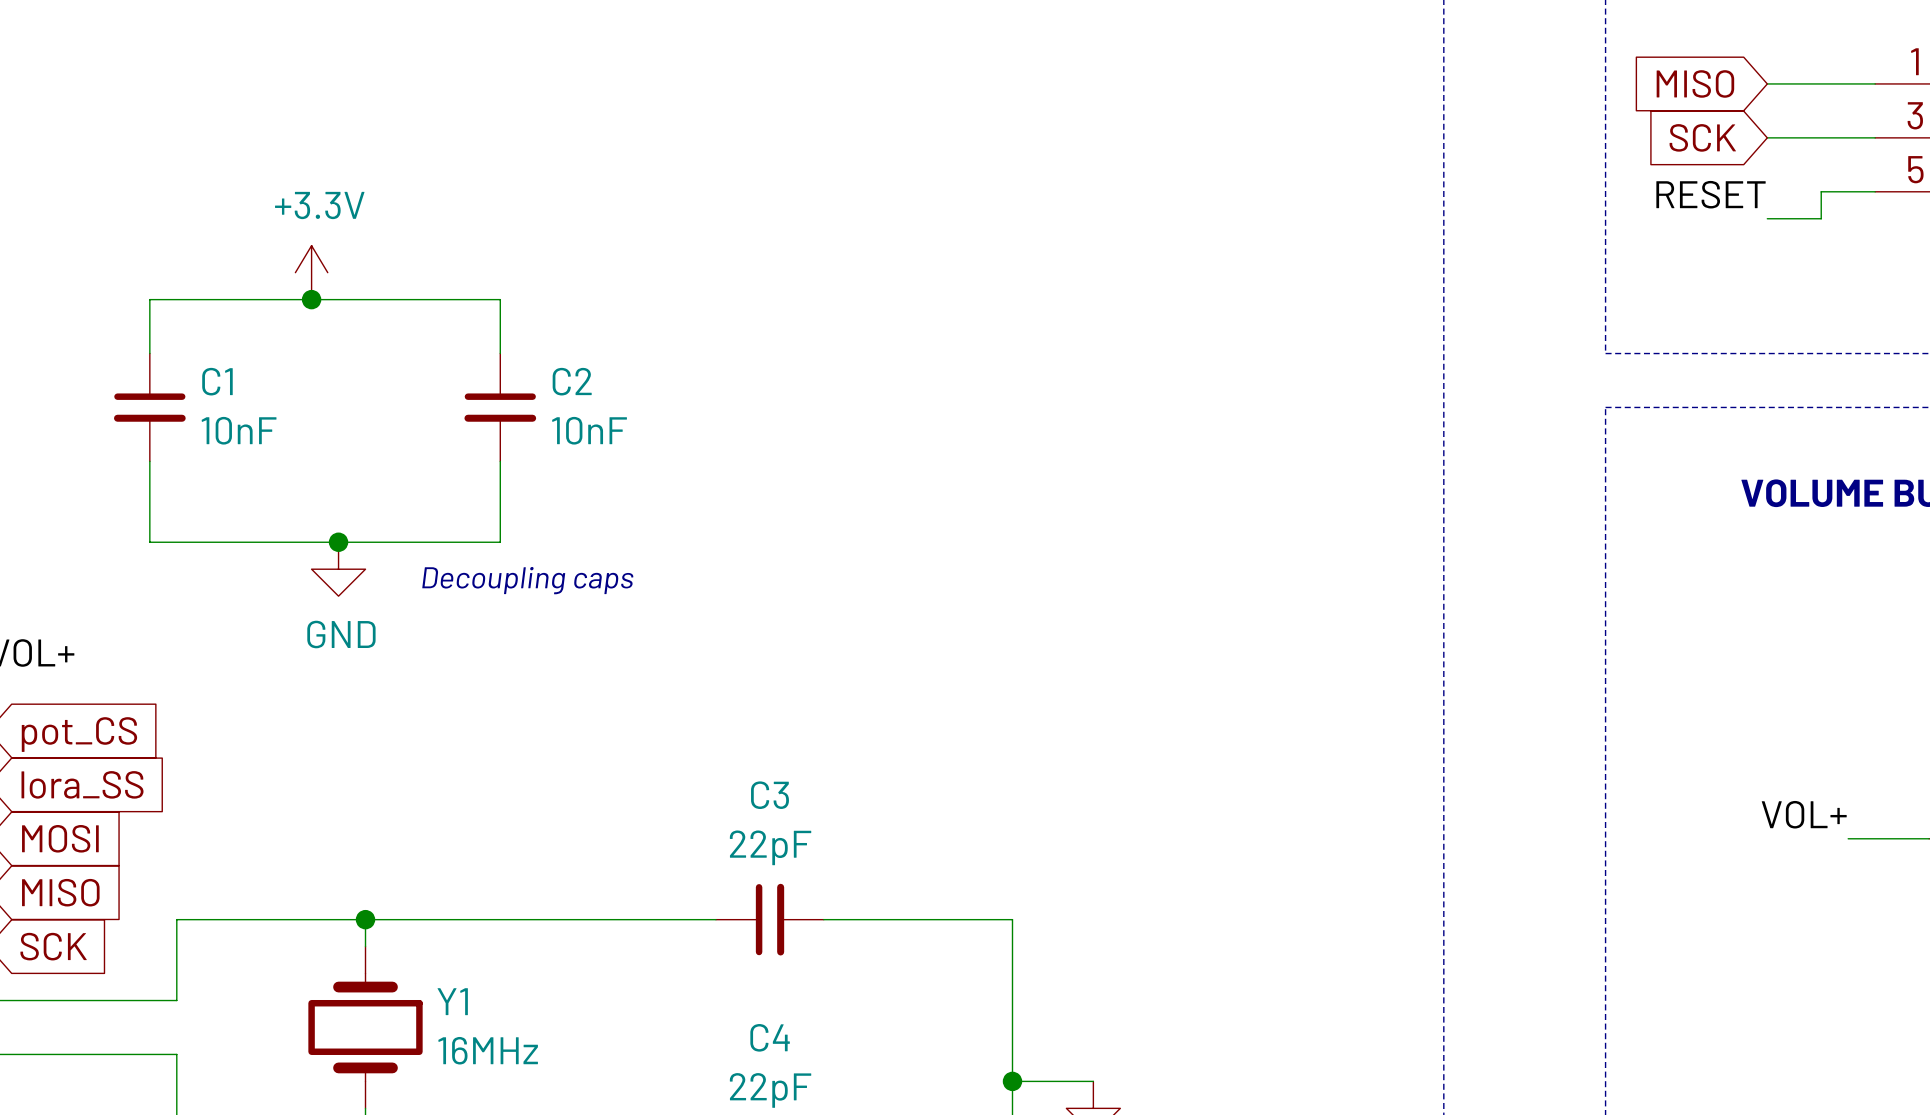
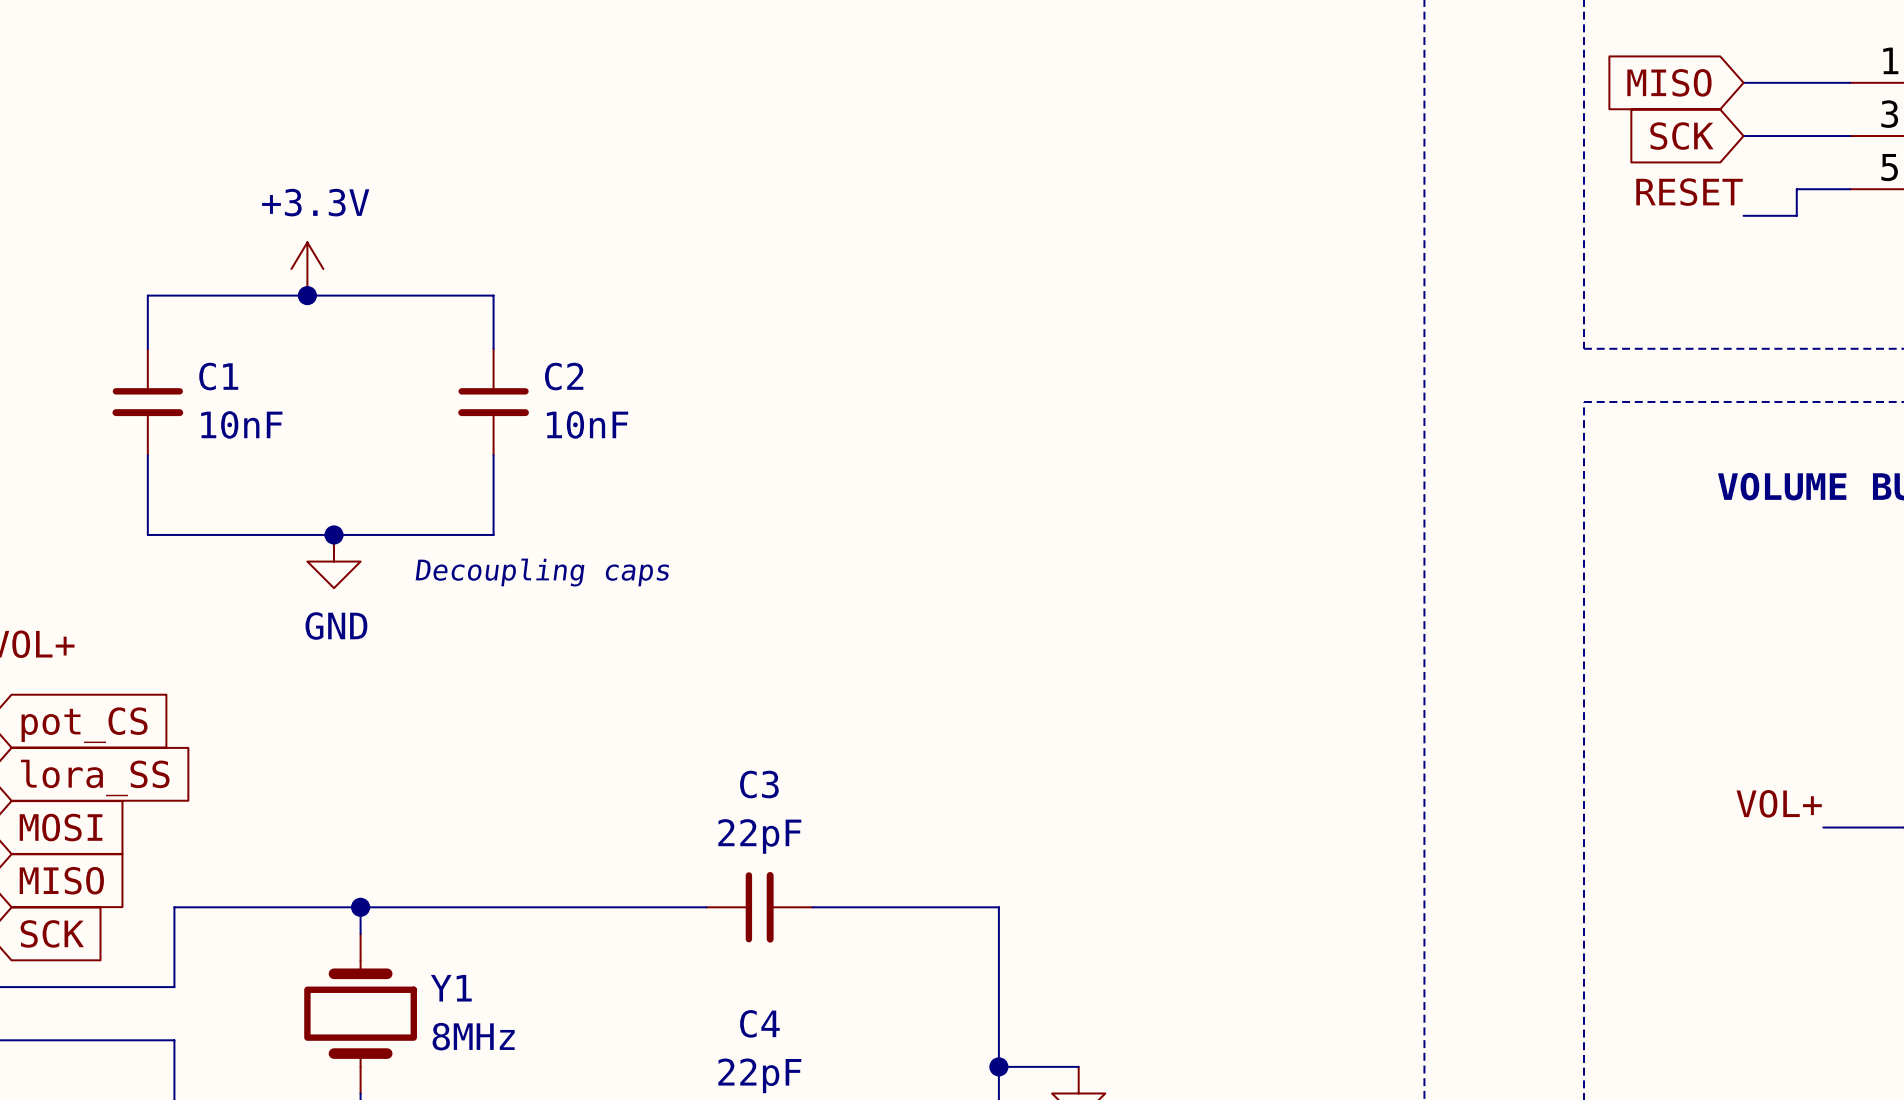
Y1 value: 16MHz (488, 1050) -> 8MHz (473, 1036)

